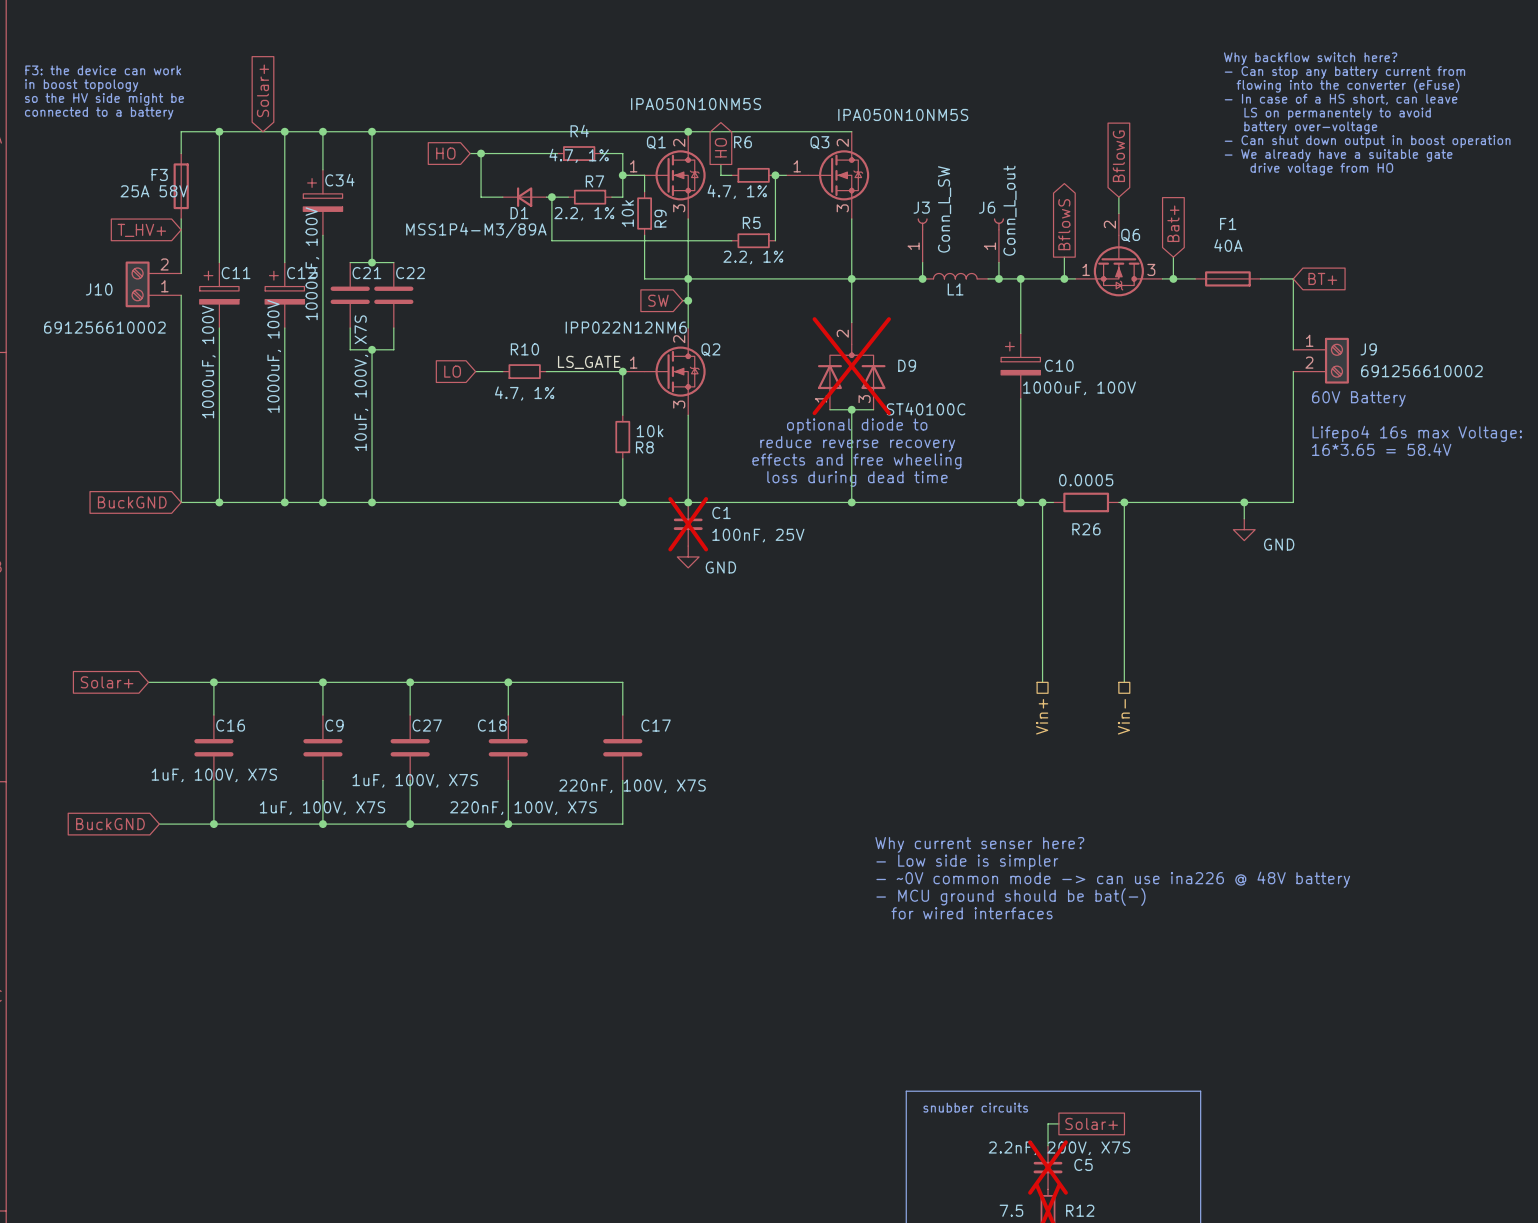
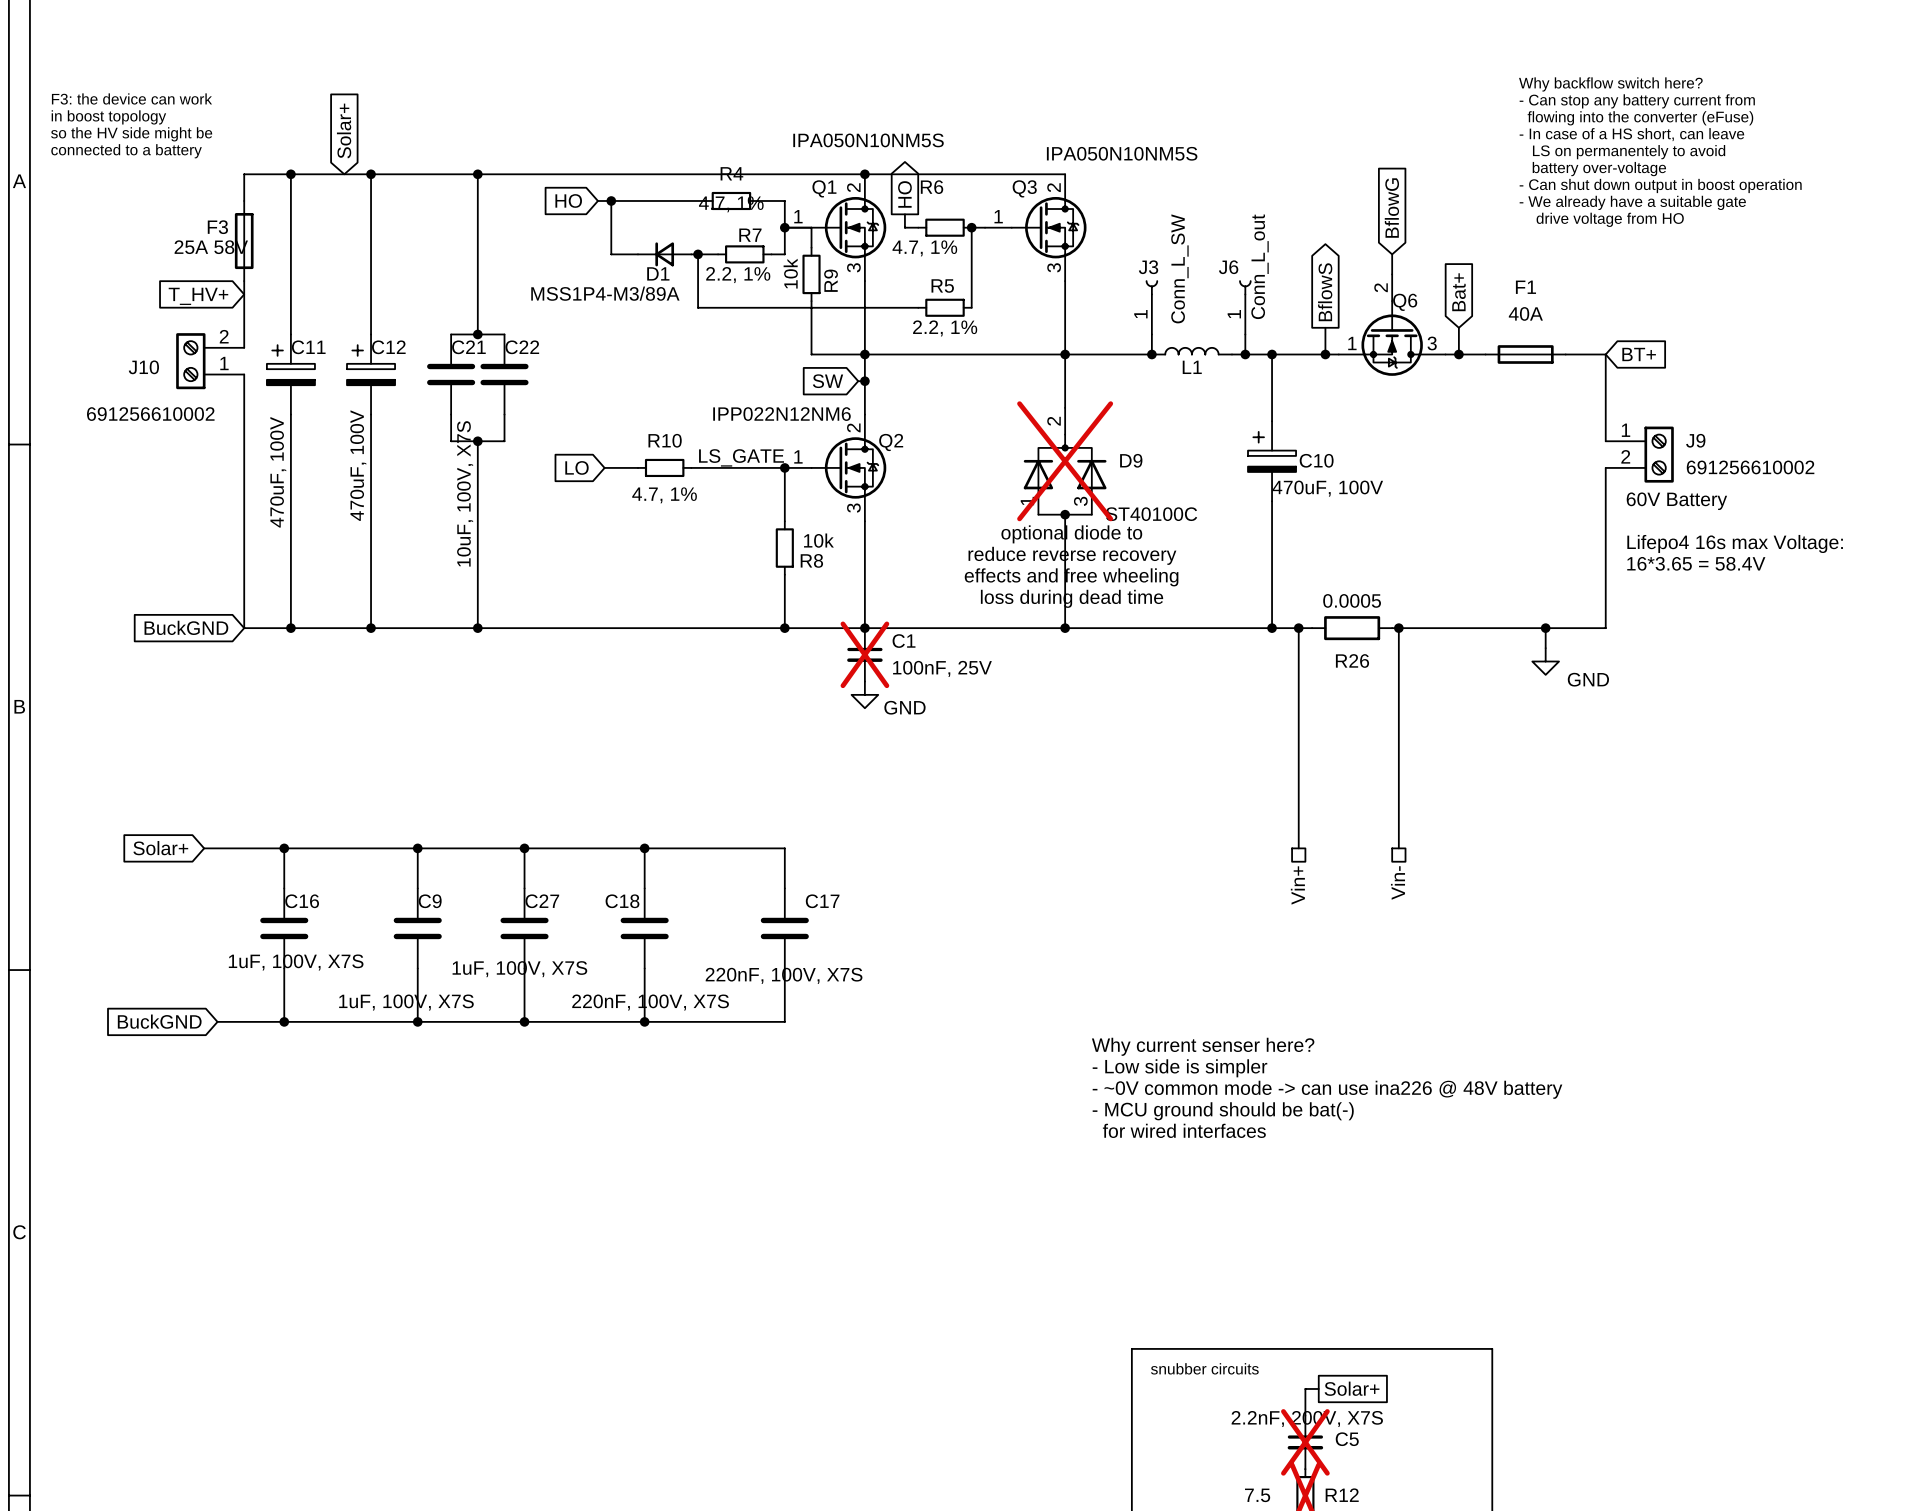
wire: (322, 131) (322, 169) -> none
junction: (322, 131) -> none
C34: 1000uF, 100V (322, 202) -> none
wire: (322, 235) (322, 502) -> none
C12 value: 1000uF, 100V (274, 356) -> 470uF, 100V (358, 465)
C11 value: 1000uF, 100V (208, 361) -> 470uF, 100V (278, 472)
C10 value: 1000uF, 100V (1079, 388) -> 470uF, 100V (1327, 488)
junction: (322, 502) -> none

